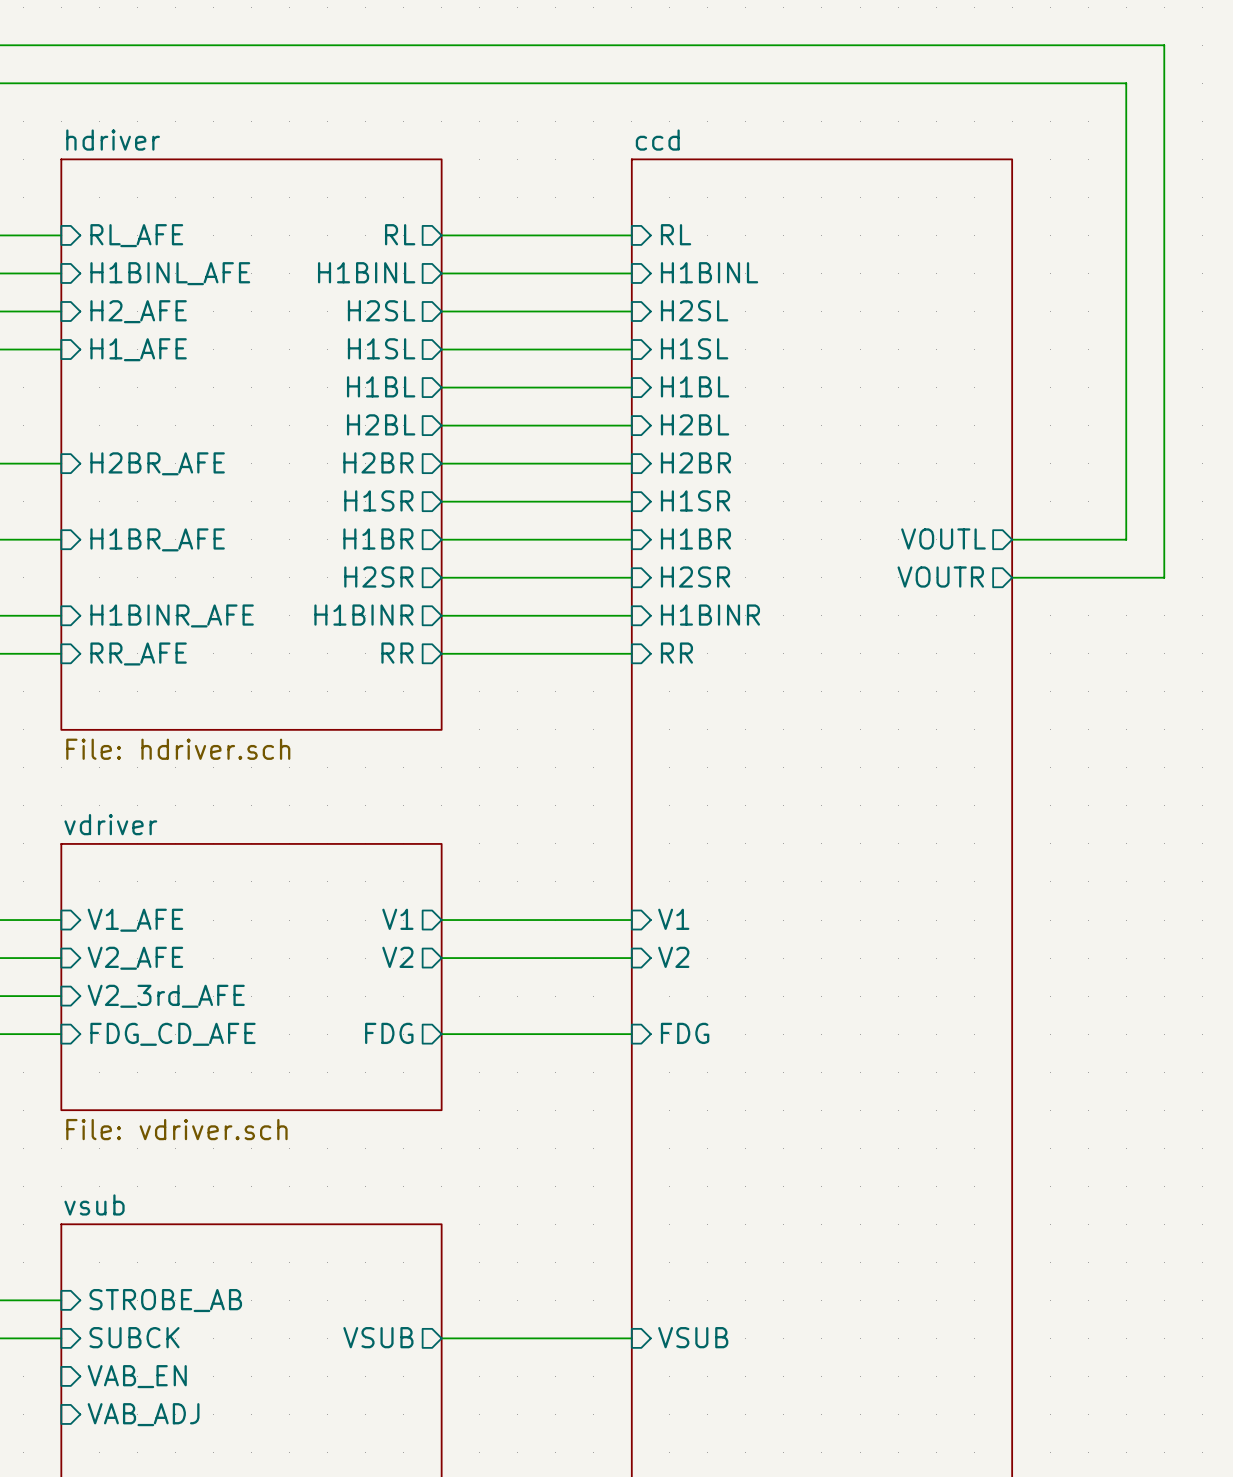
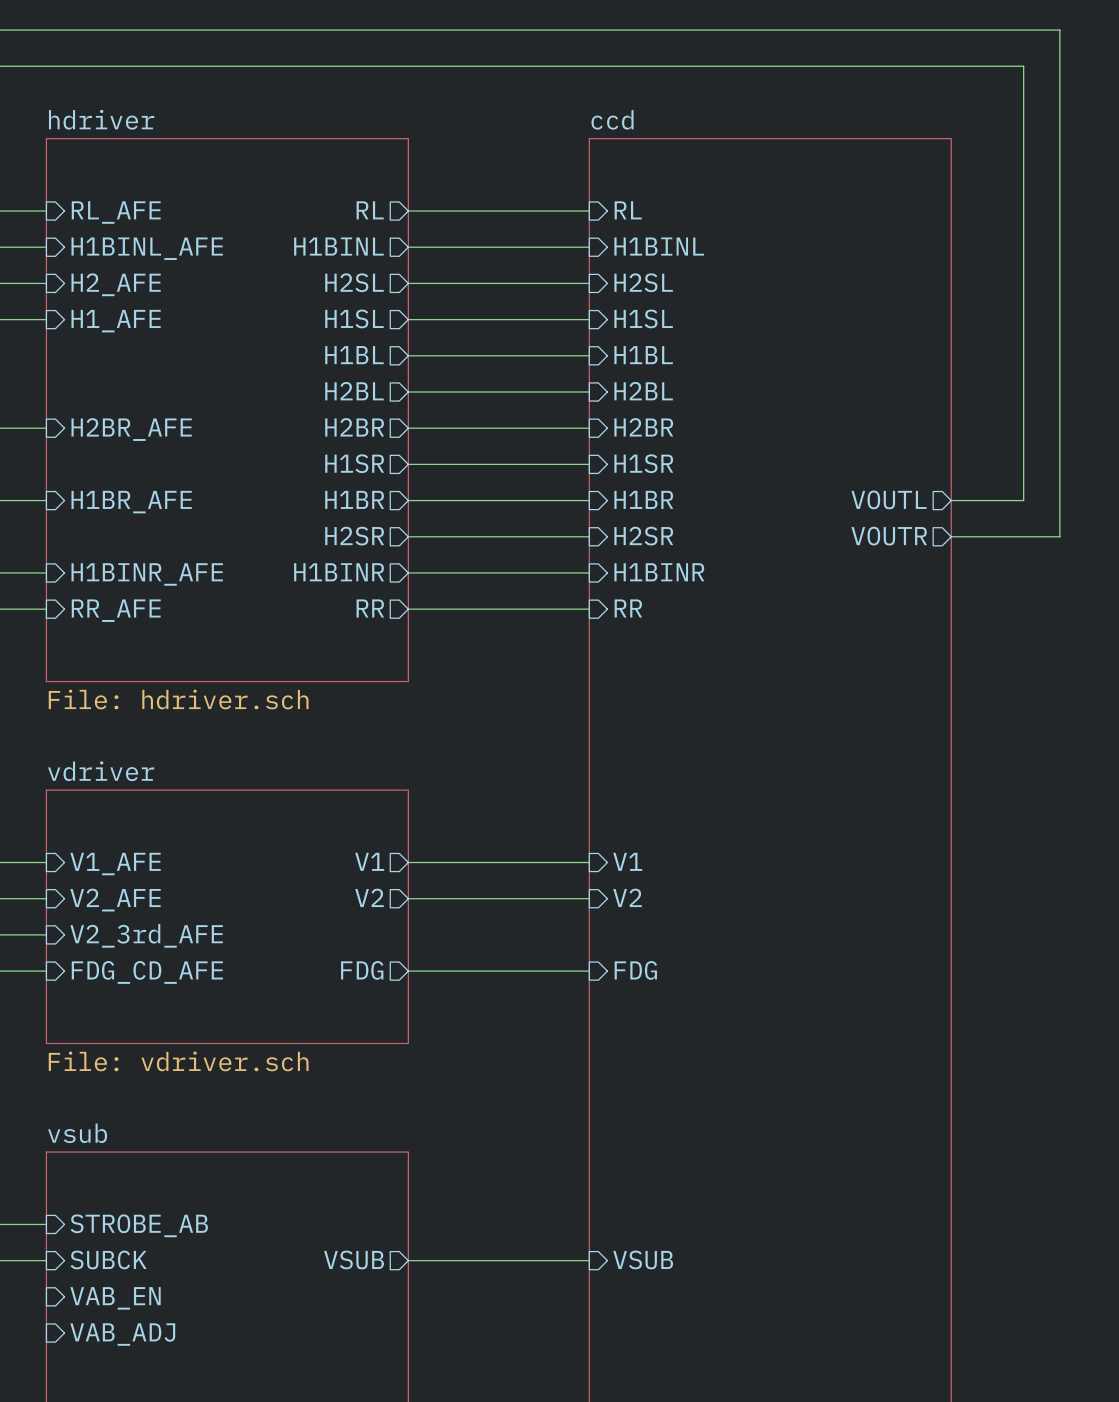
wire: (1126, 45) (1164, 45) (1164, 577) (1126, 577) -> none
wire: (1088, 83) (1126, 83) -> (1059, 30) (1059, 66)
wire: none -> (1023, 66) (1023, 500)
wire: (1088, 539) (1126, 539) -> (1059, 536) (1059, 500)

